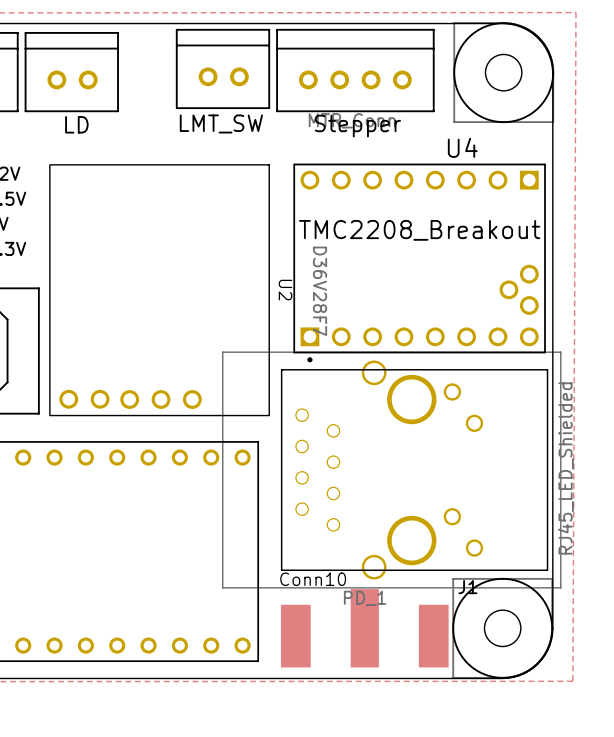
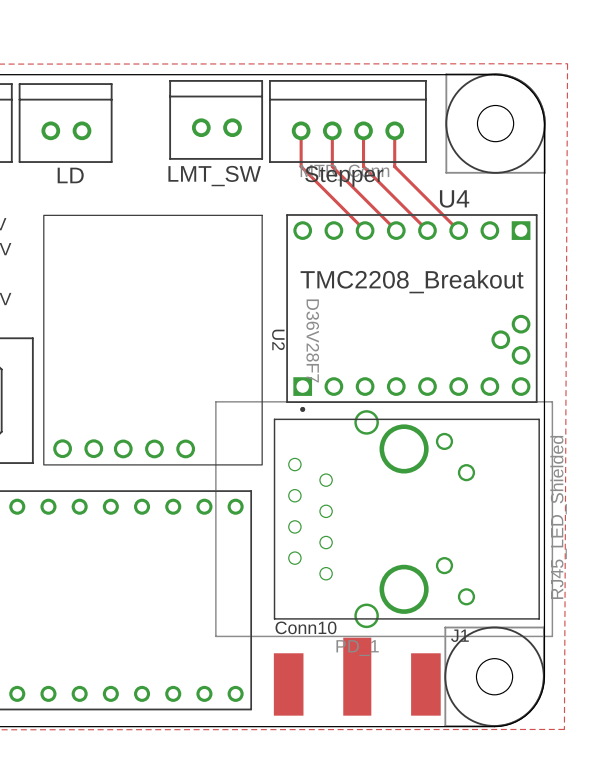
track: none -> (301, 130) (301, 166) (365, 230)
track: none -> (332, 130) (332, 166) (396, 230)
track: none -> (363, 130) (363, 166) (427, 230)
track: none -> (394, 130) (394, 166) (458, 230)

